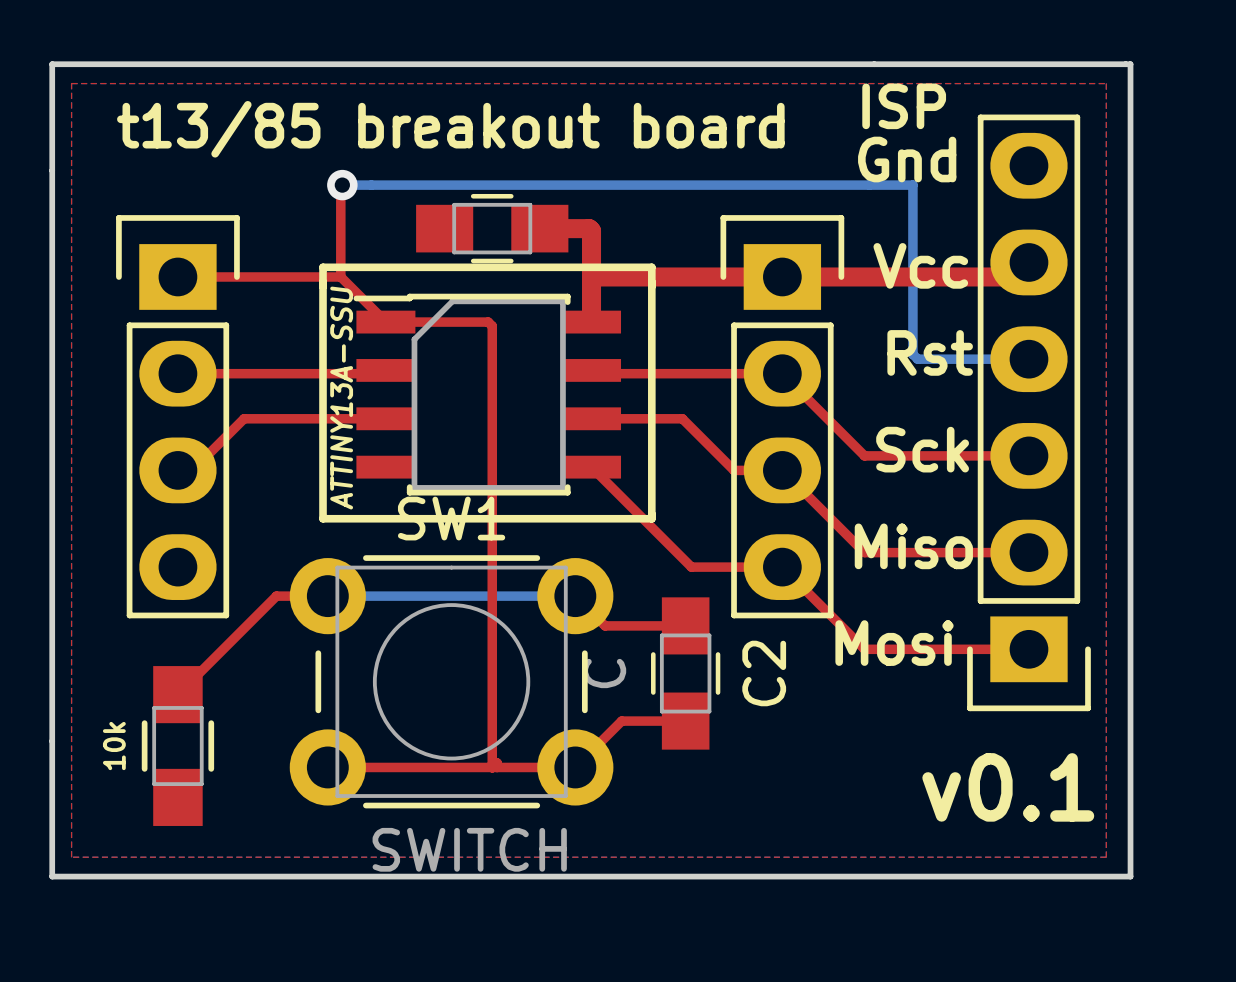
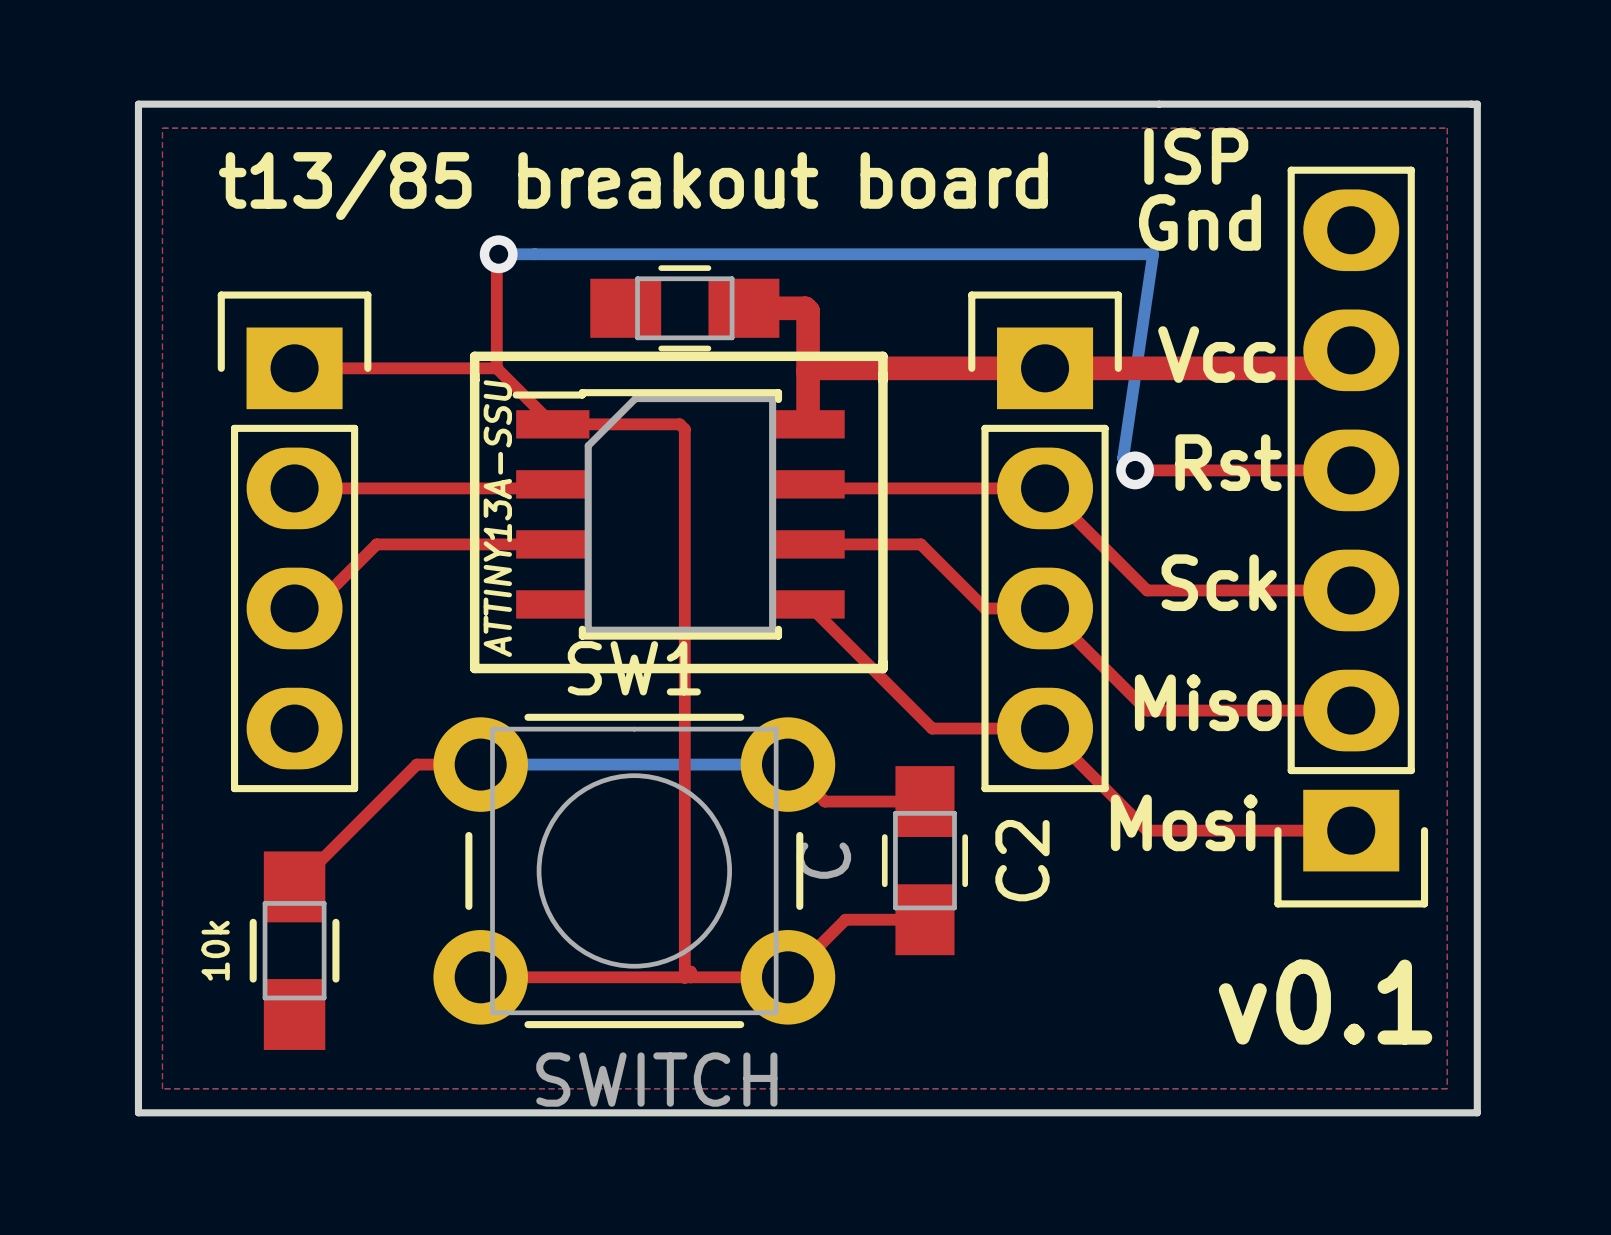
bottom track: (869, 185) (912, 185) (912, 354) (917, 359) (1028, 359) -> (1153, 254) (1123, 458) (1135, 470)
top track: none -> (1135, 470) (1351, 470)
via: none -> (1135, 470)

